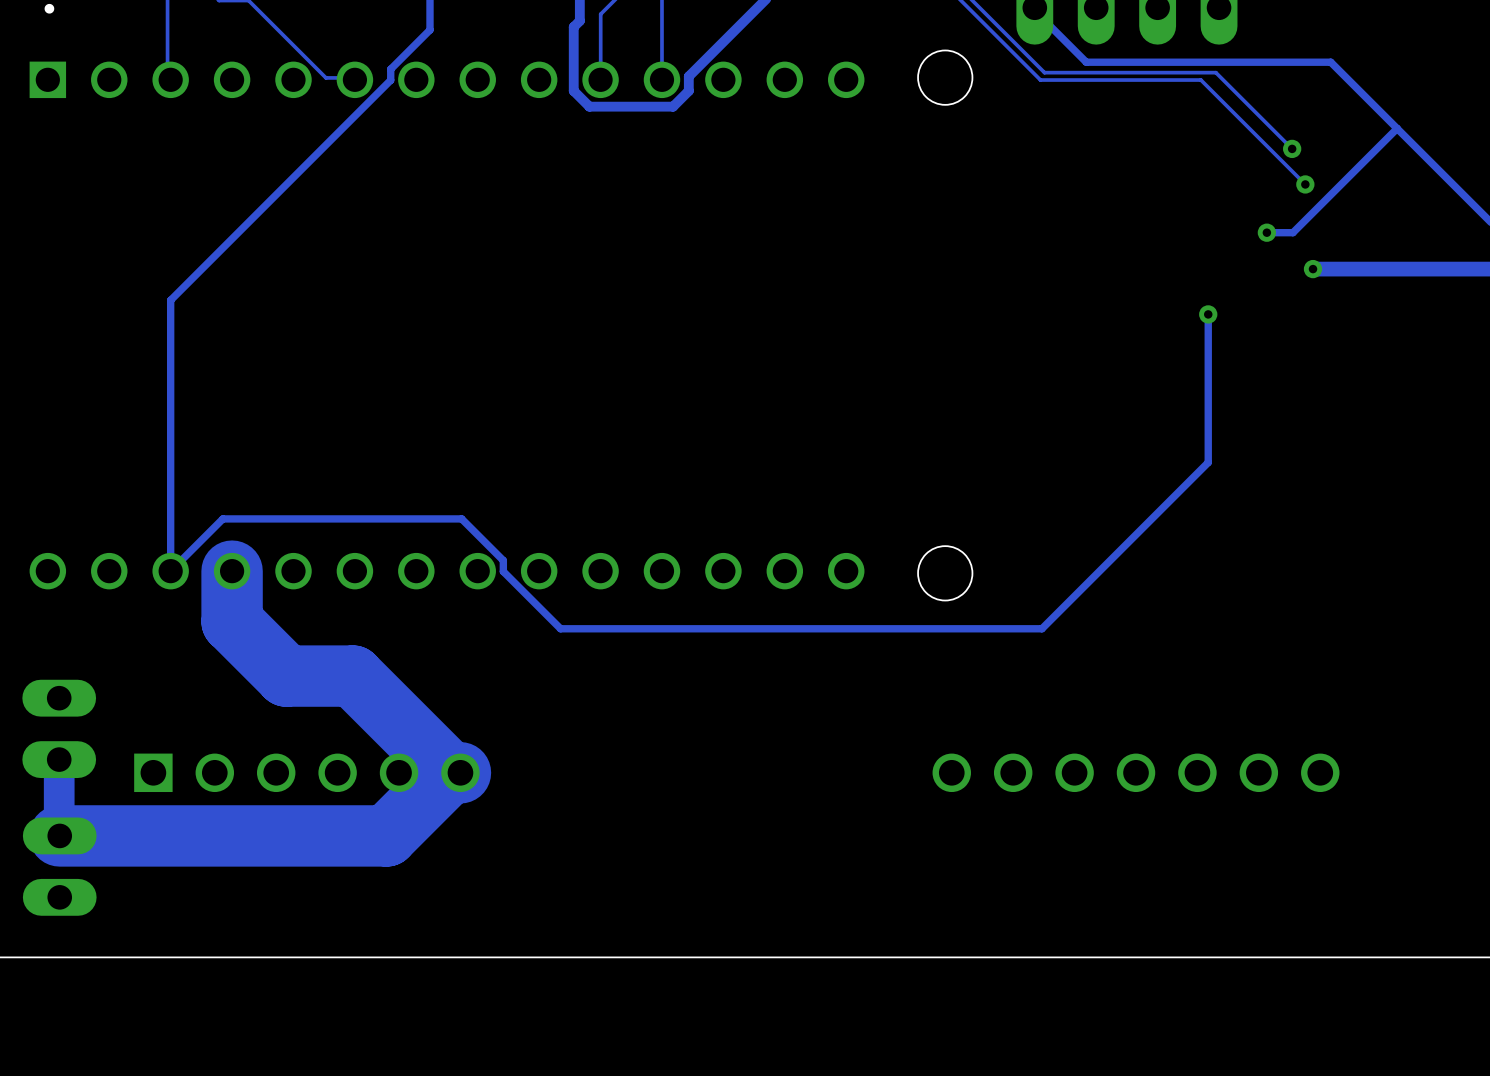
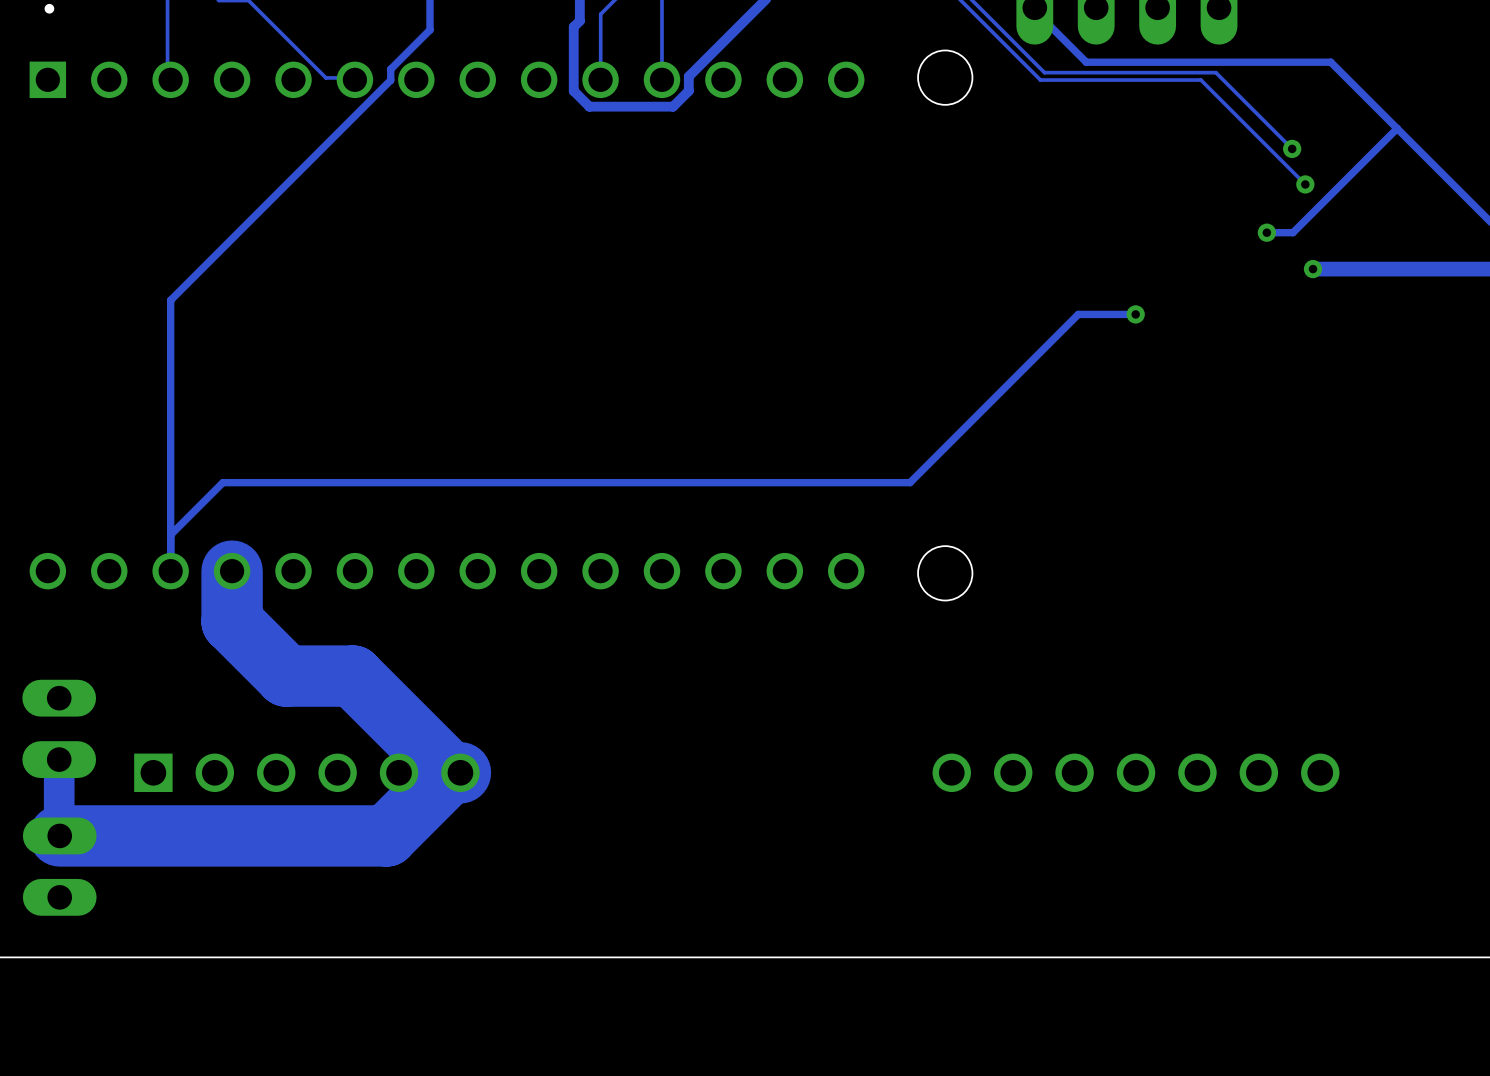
track: none -> (1135, 314) (1078, 314) (910, 482) (222, 482) (170, 534)
track: (1208, 314) (1208, 462) (1041, 628) (560, 628) (503, 571) (503, 560) (461, 518) (222, 518) (170, 571) -> none
via position: (1208, 314) -> (1135, 314)

